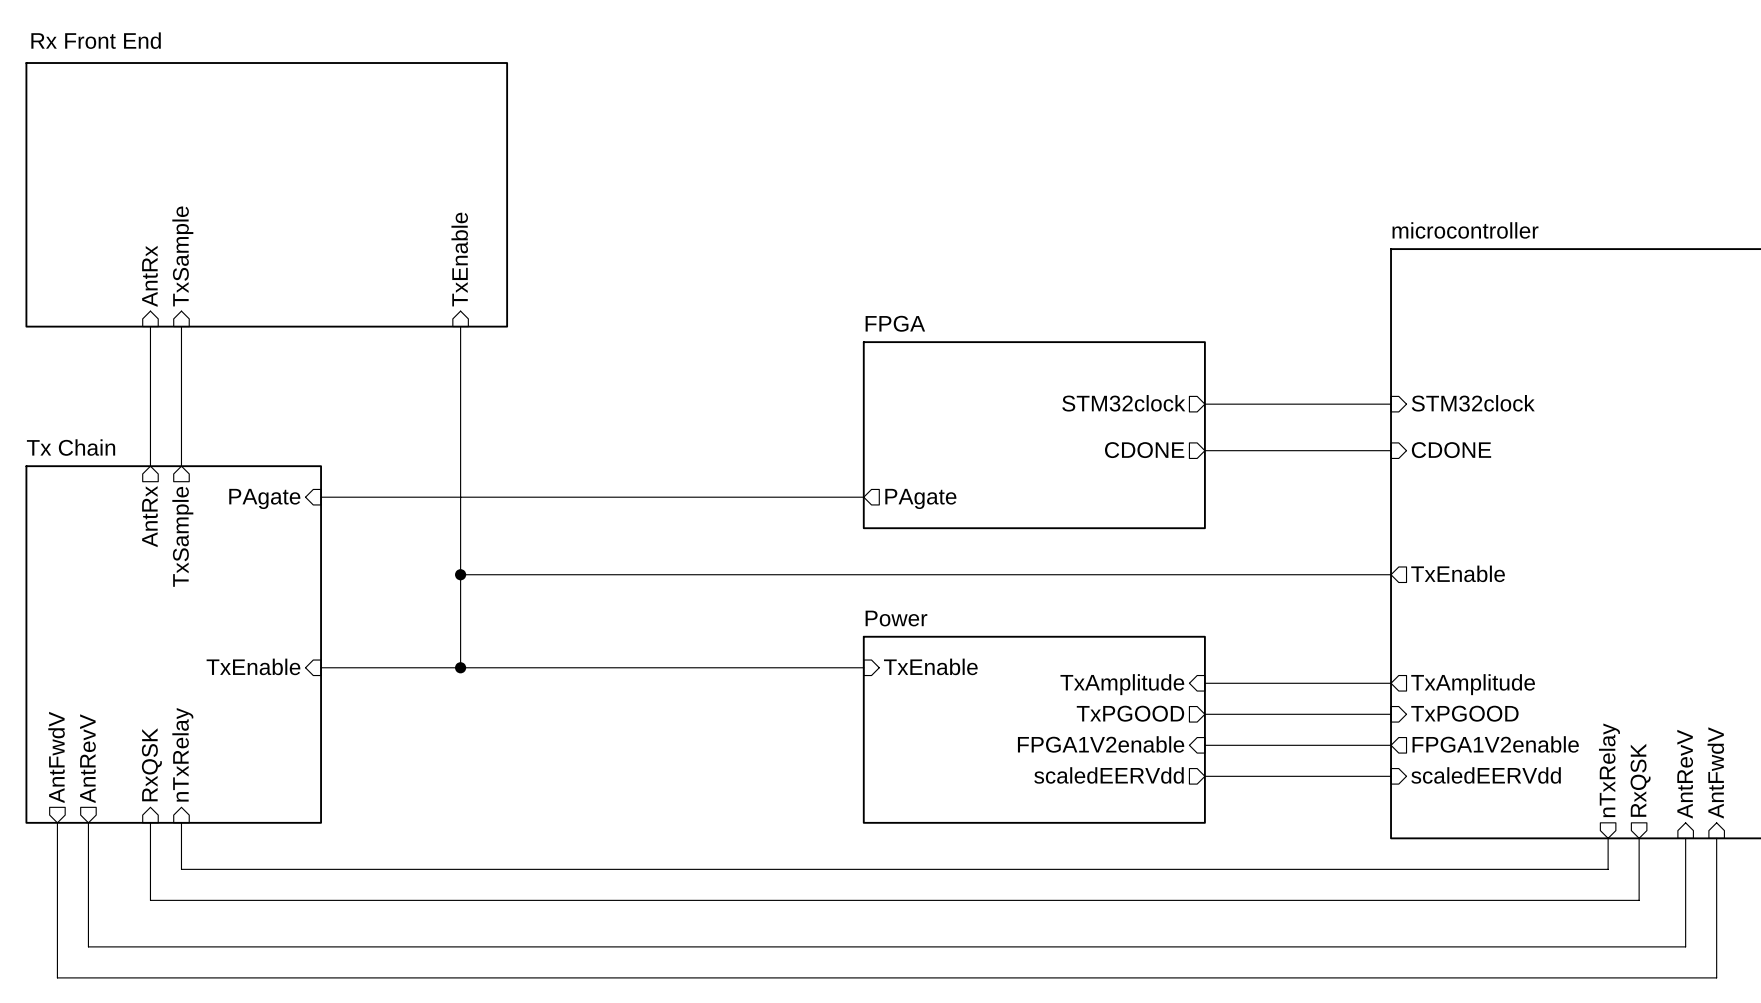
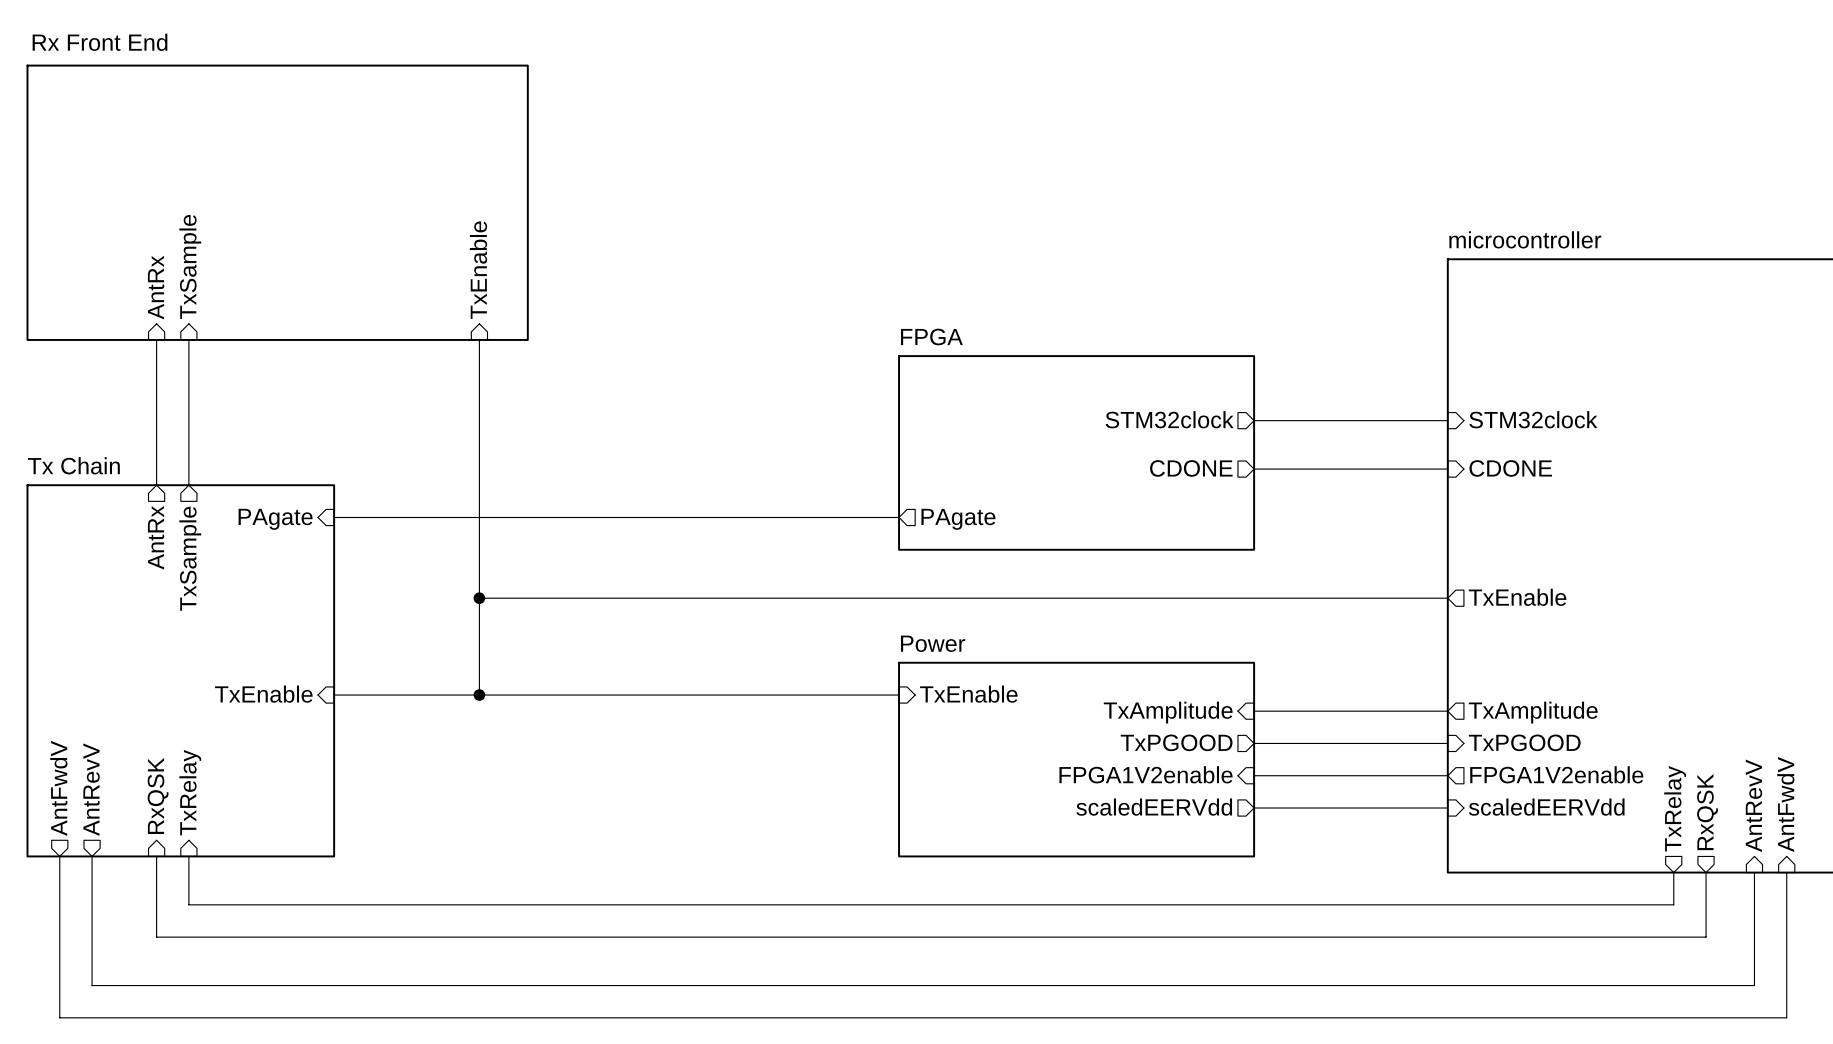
sheet pin: nTxRelay (182, 754) -> TxRelay (190, 792)
sheet pin: nTxRelay (1609, 770) -> TxRelay (1675, 808)

